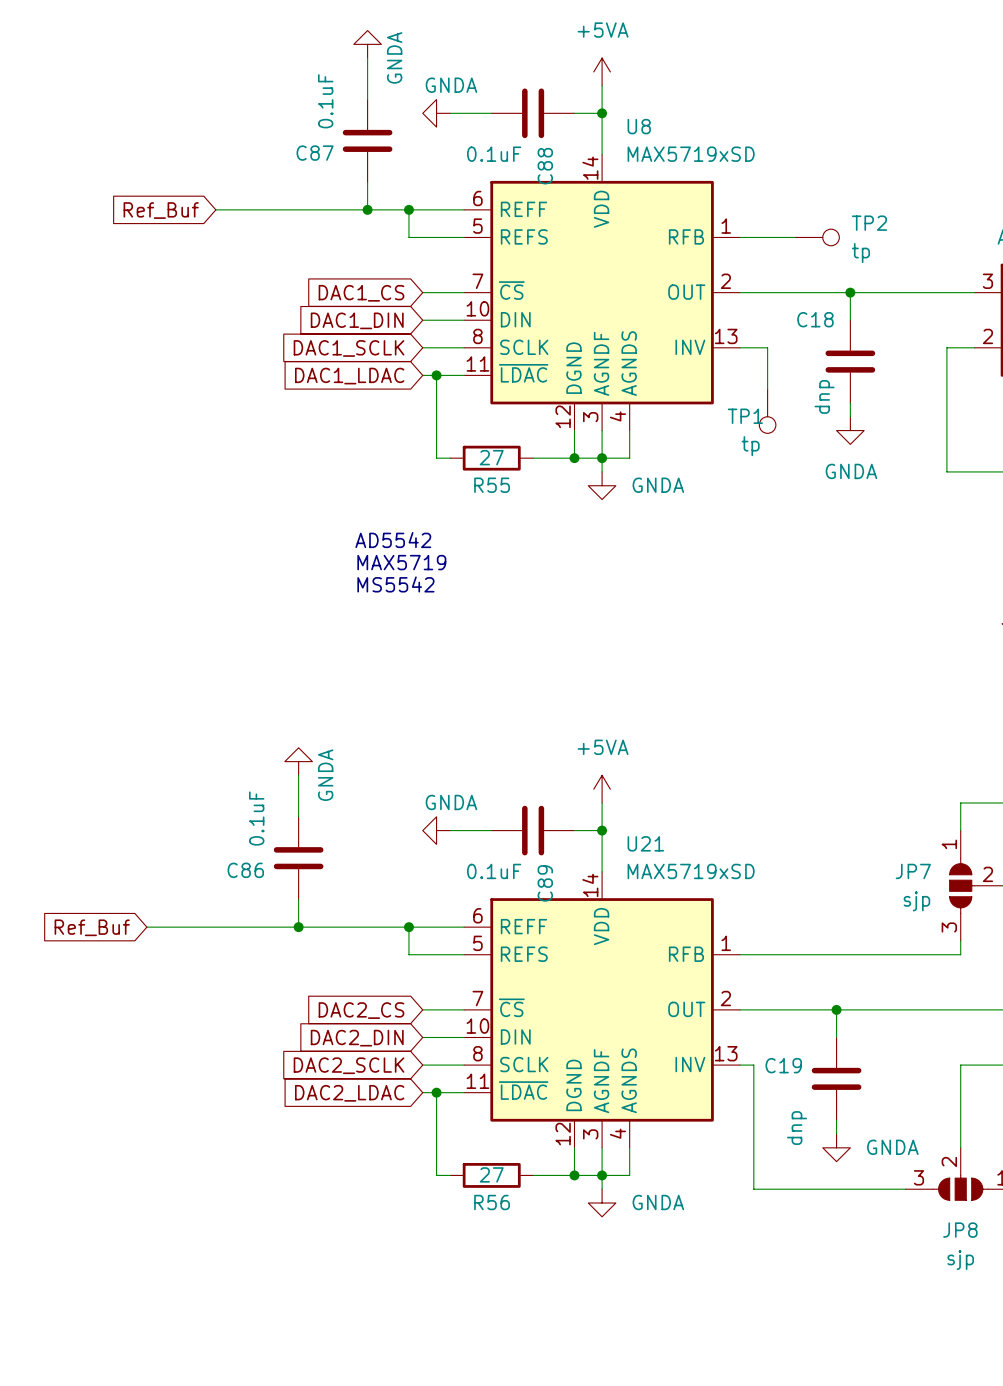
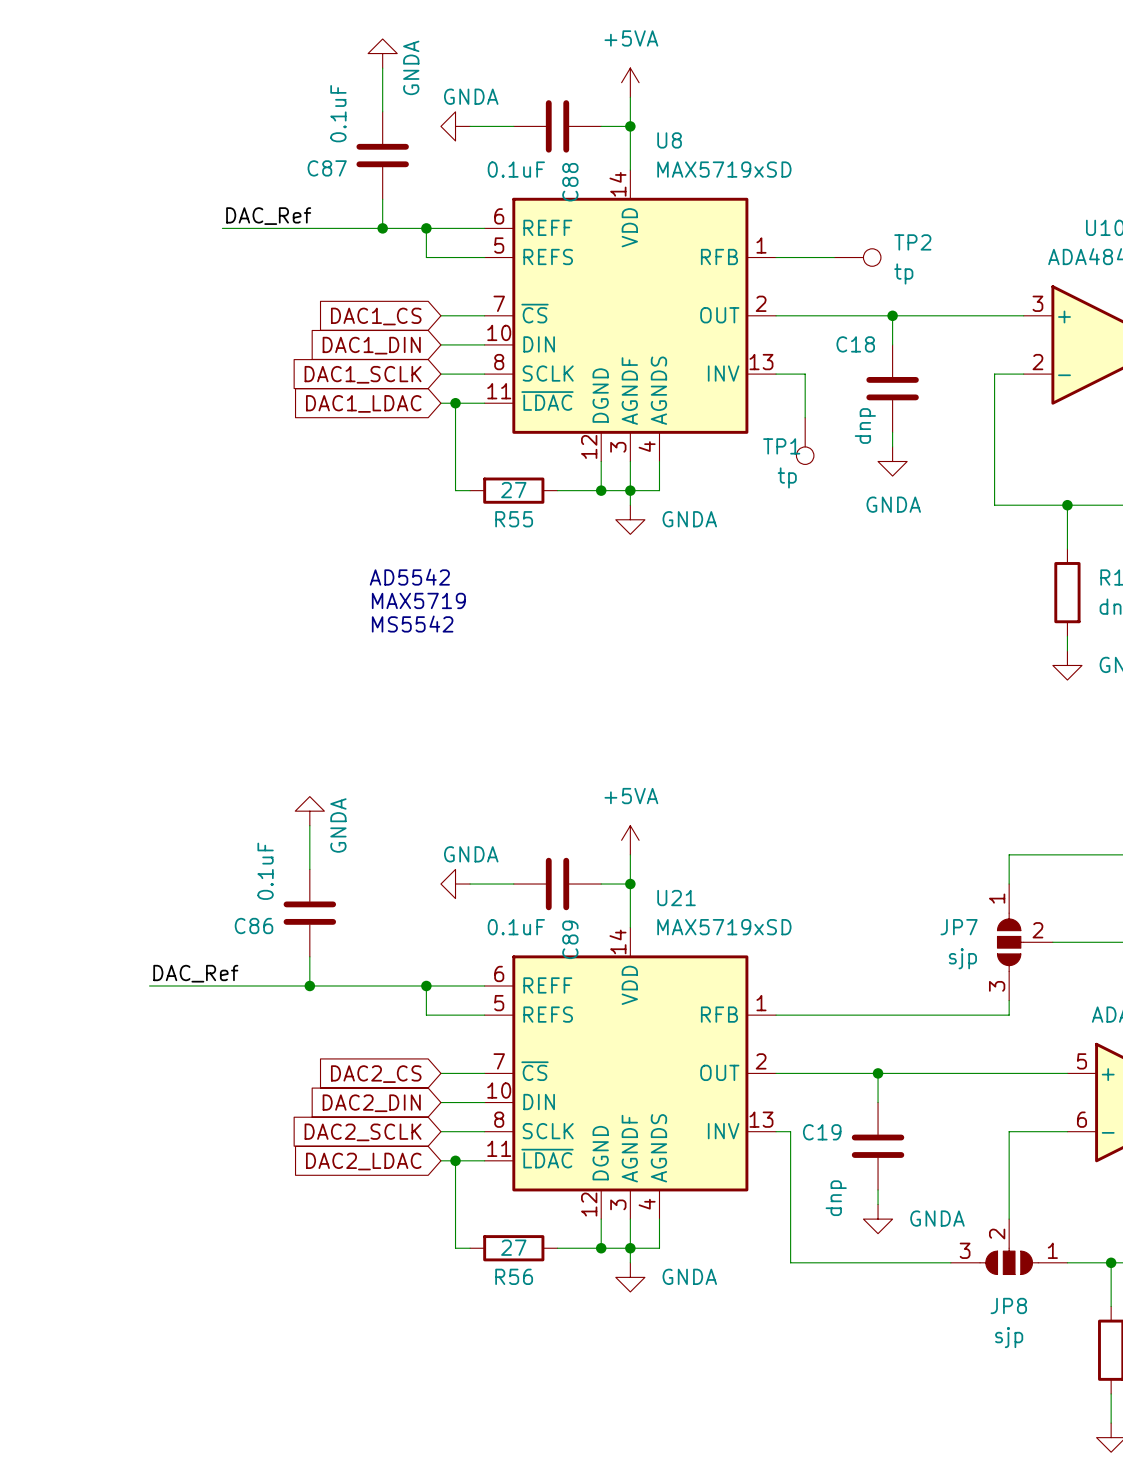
label: none -> DAC_Ref (268, 216)
global label: Ref_Buf (161, 210) -> none
label: none -> DAC_Ref (195, 973)
global label: Ref_Buf (92, 927) -> none

